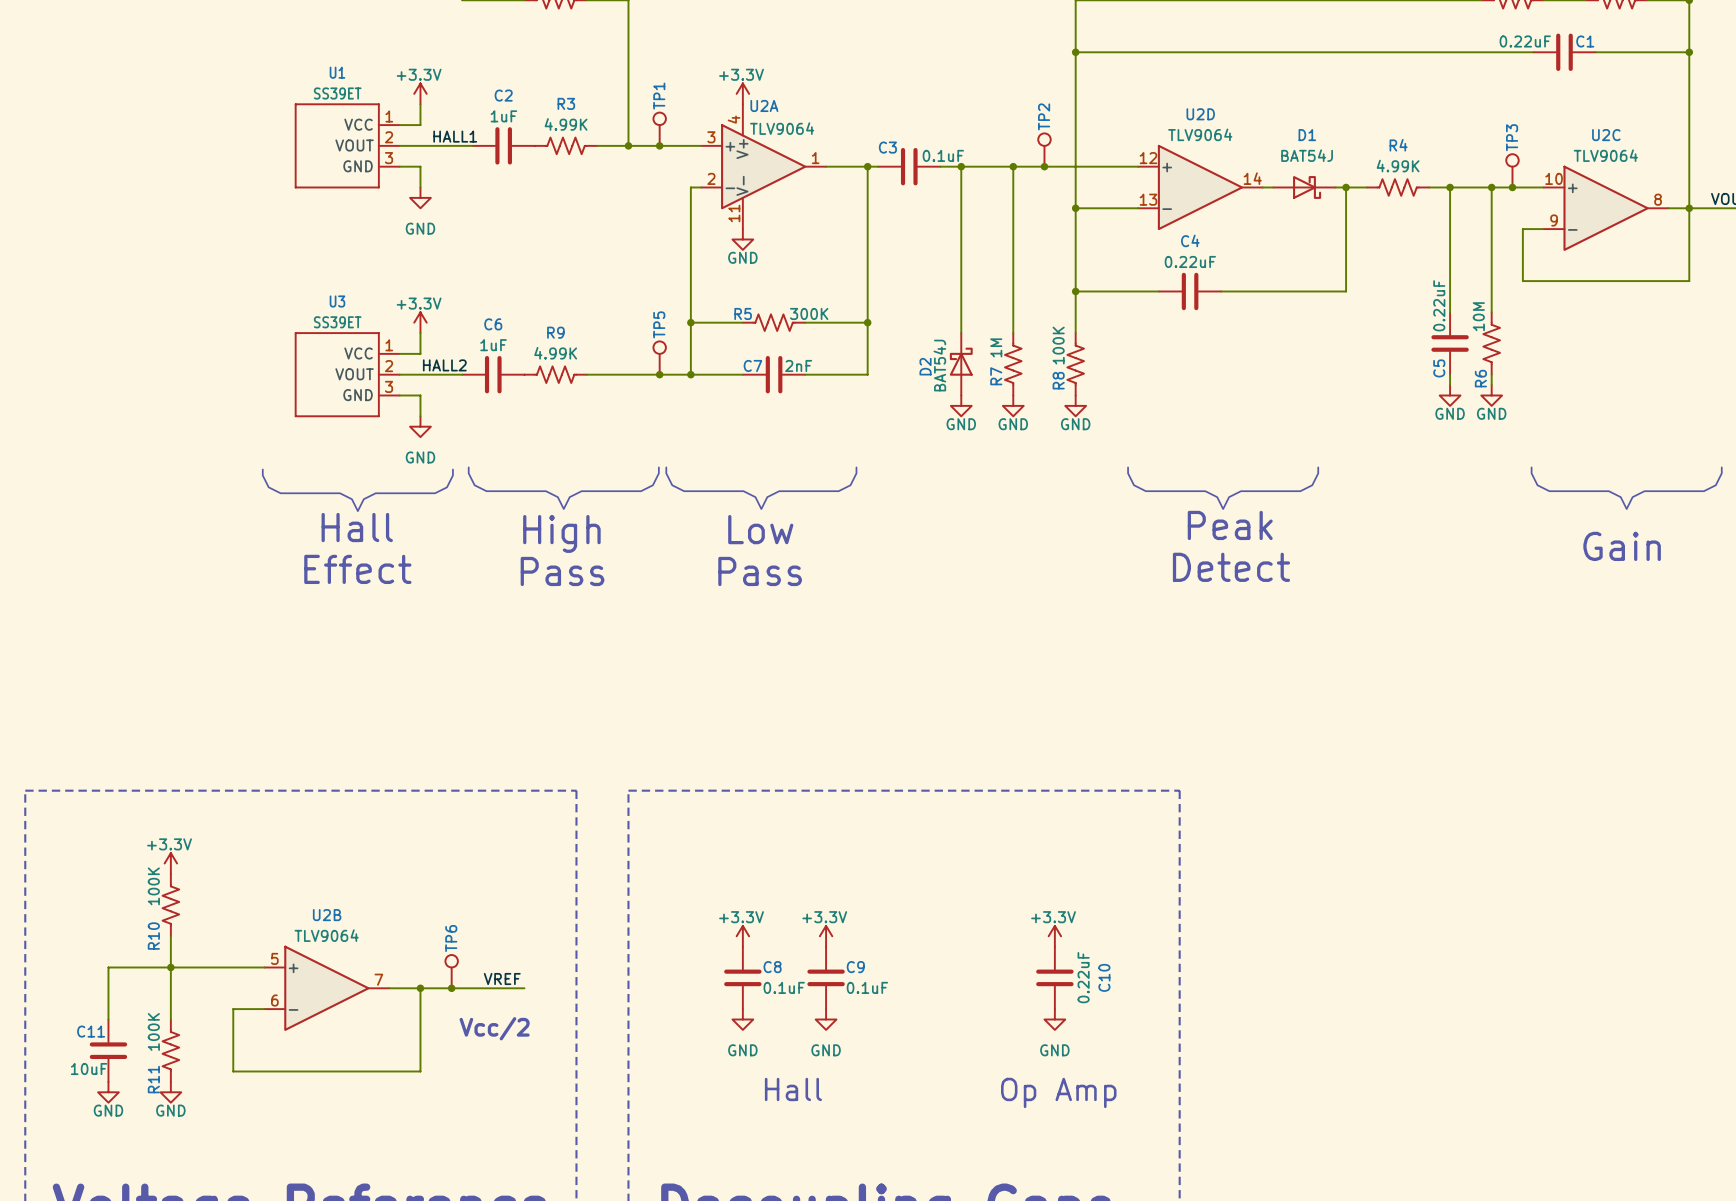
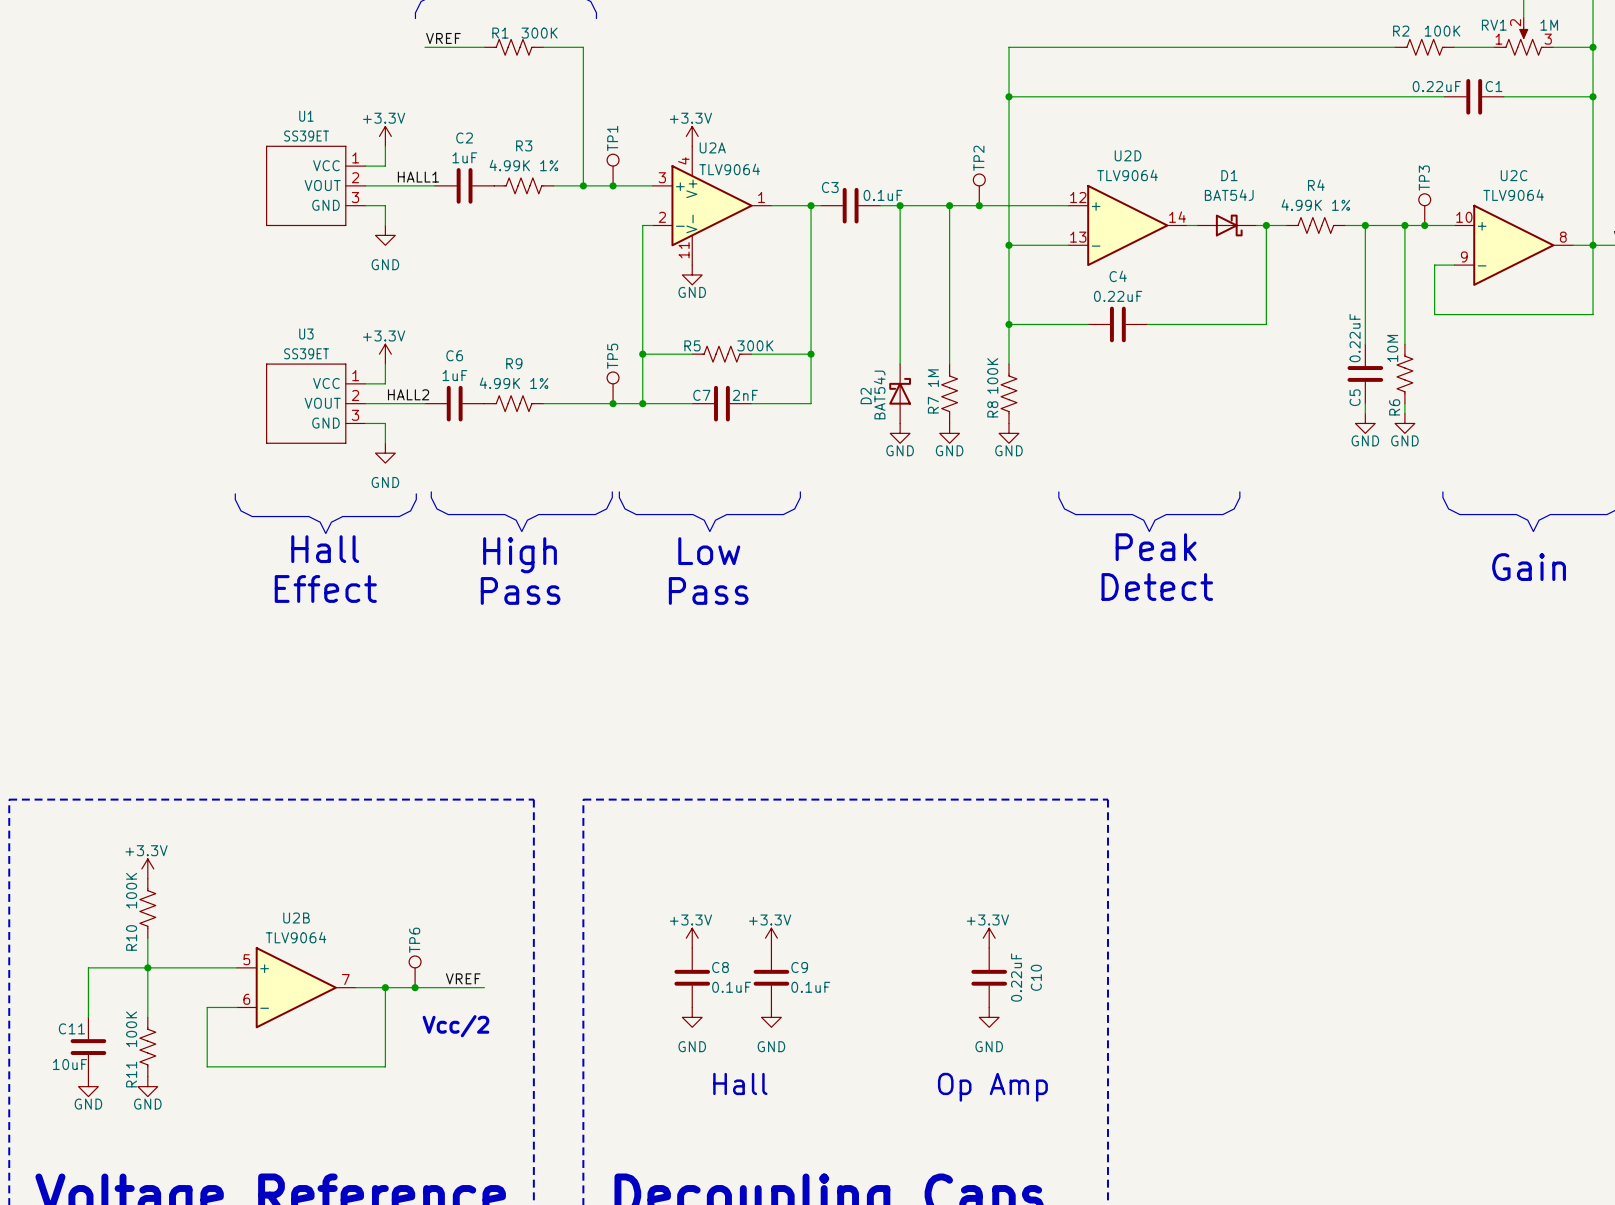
R3 value: 4.99K (566, 124) -> 4.99K 1% (523, 165)
R4 value: 4.99K (1398, 166) -> 4.99K 1% (1315, 205)
R9 value: 4.99K (555, 353) -> 4.99K 1% (514, 383)

